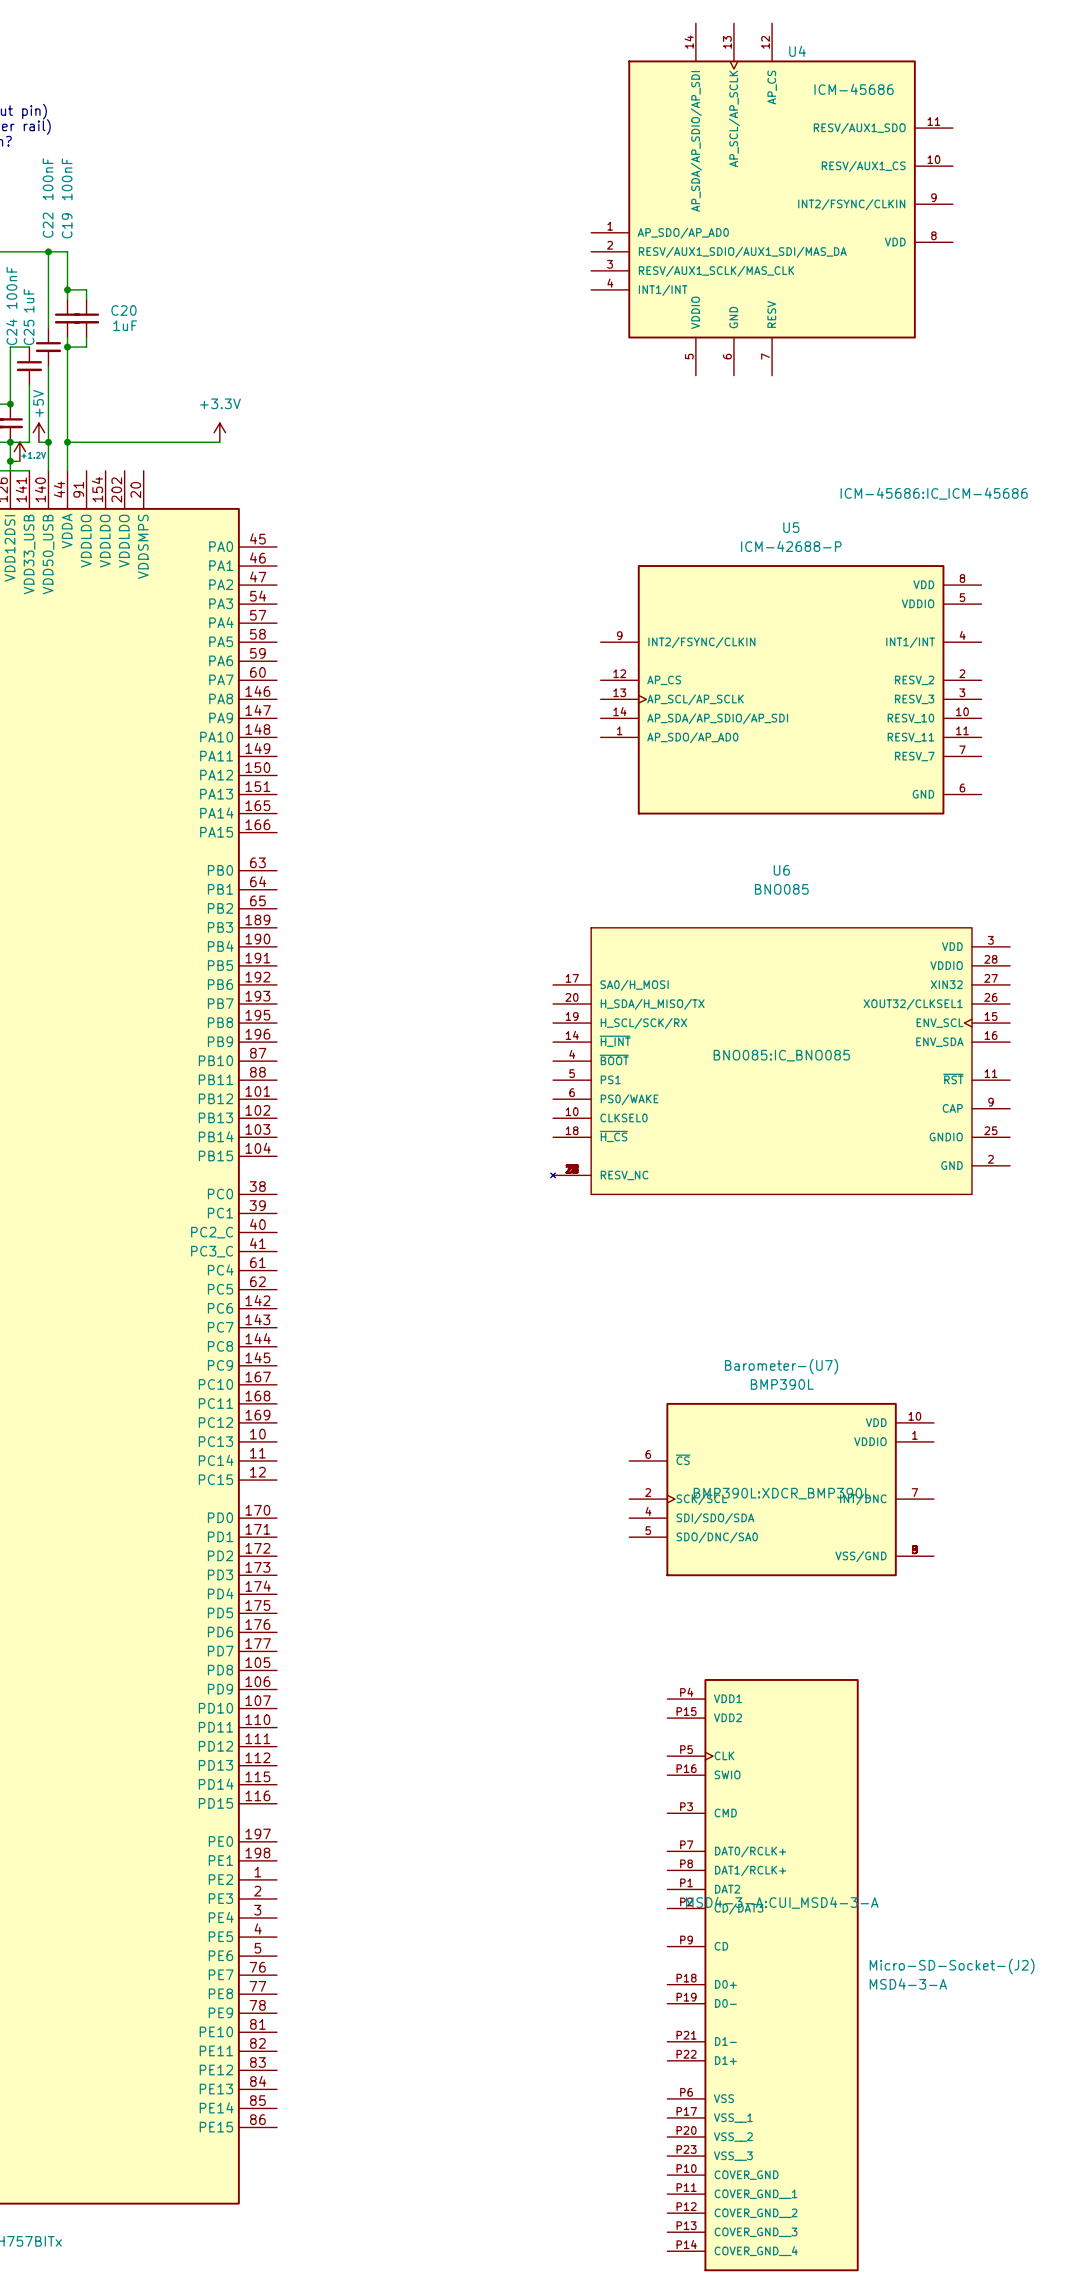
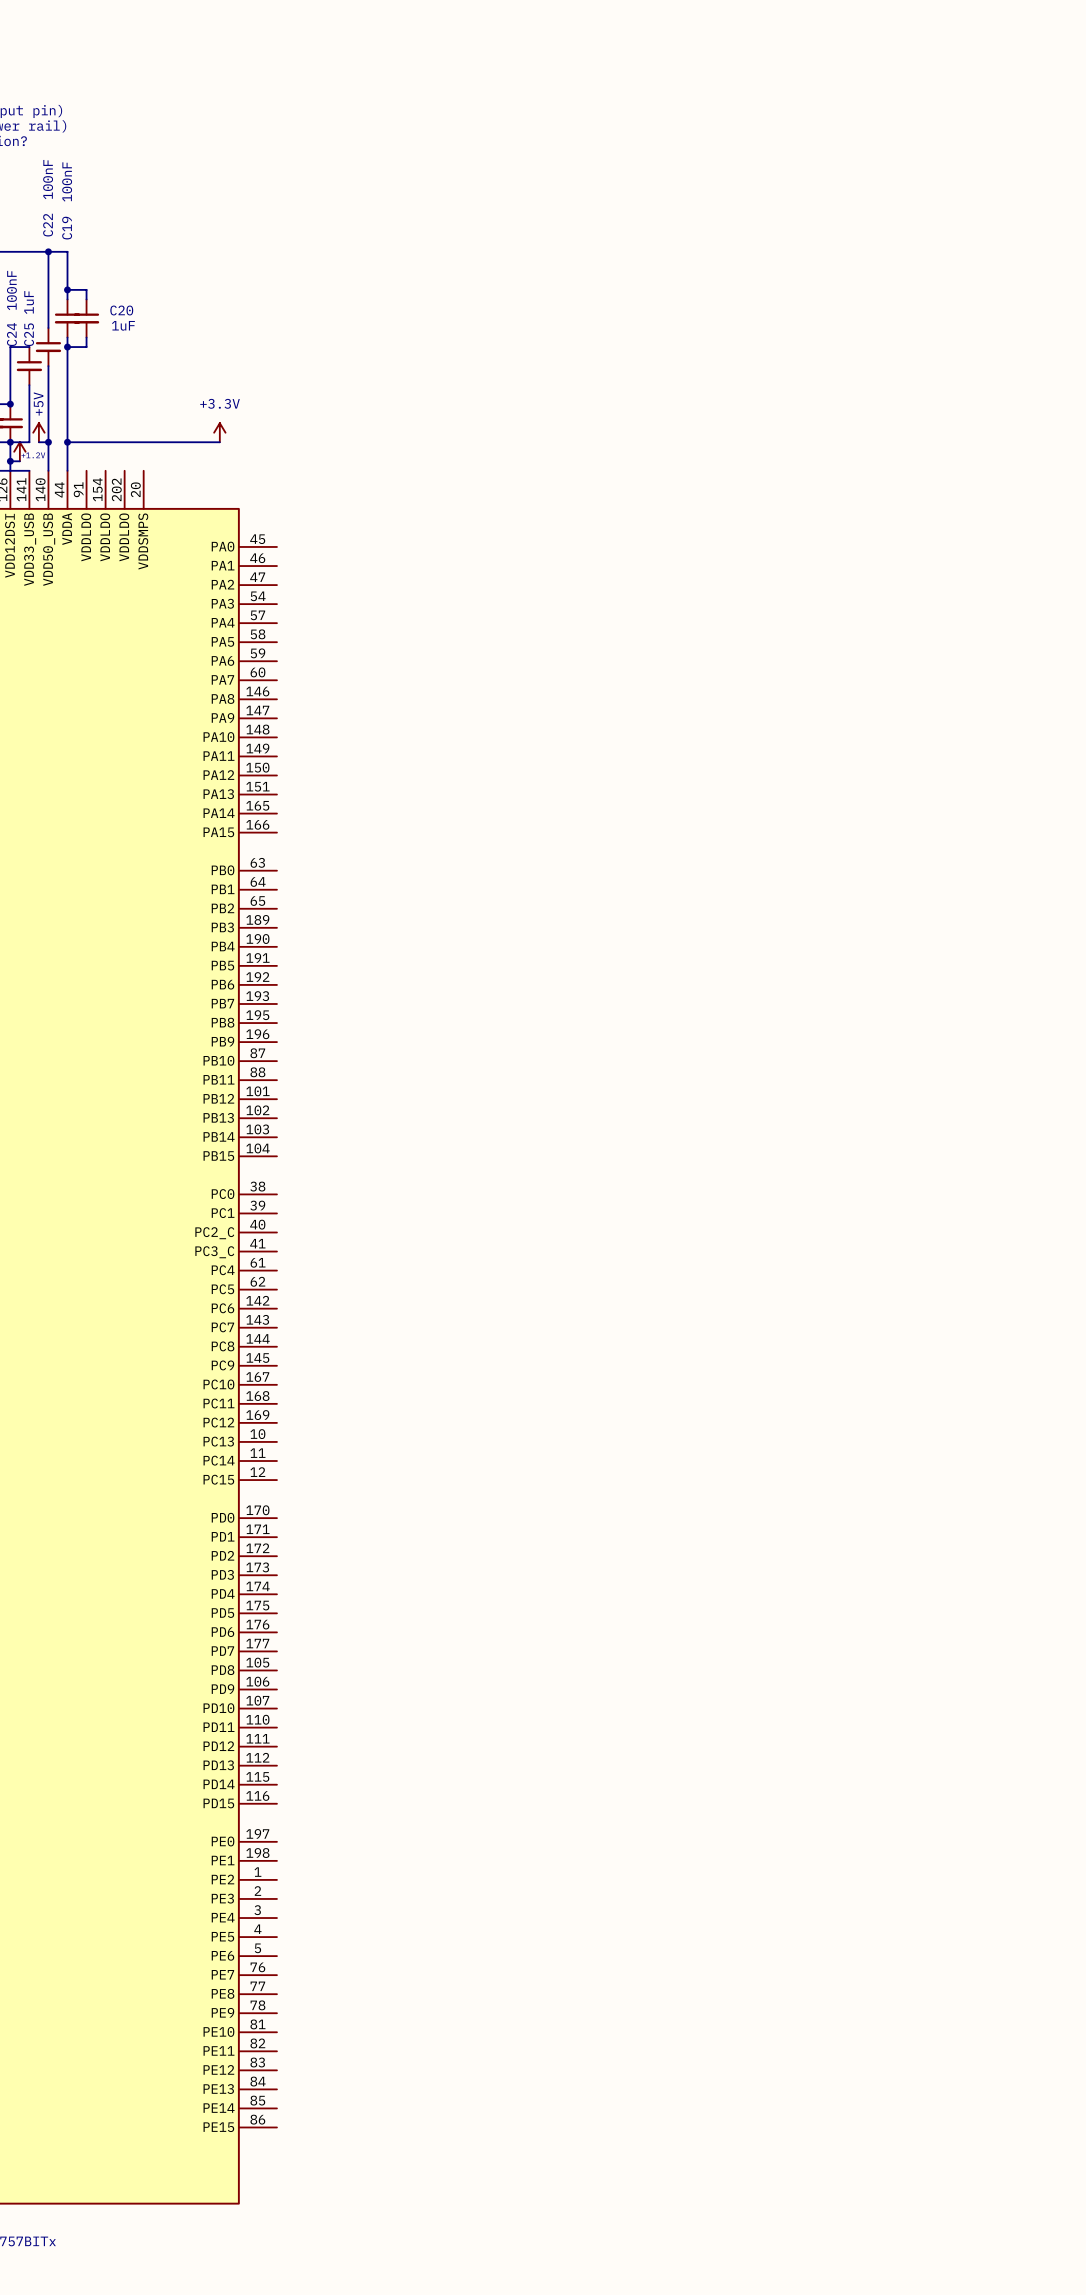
U4: ICM-45686 (772, 199) -> none
U5: ICM-42688-P (791, 689) -> none
U6: BNO085 (780, 1061) -> none
Barometer-(U7): BMP390L (781, 1489) -> none
Micro-SD-Socket-(J2): MSD4-3-A (763, 1975) -> none

